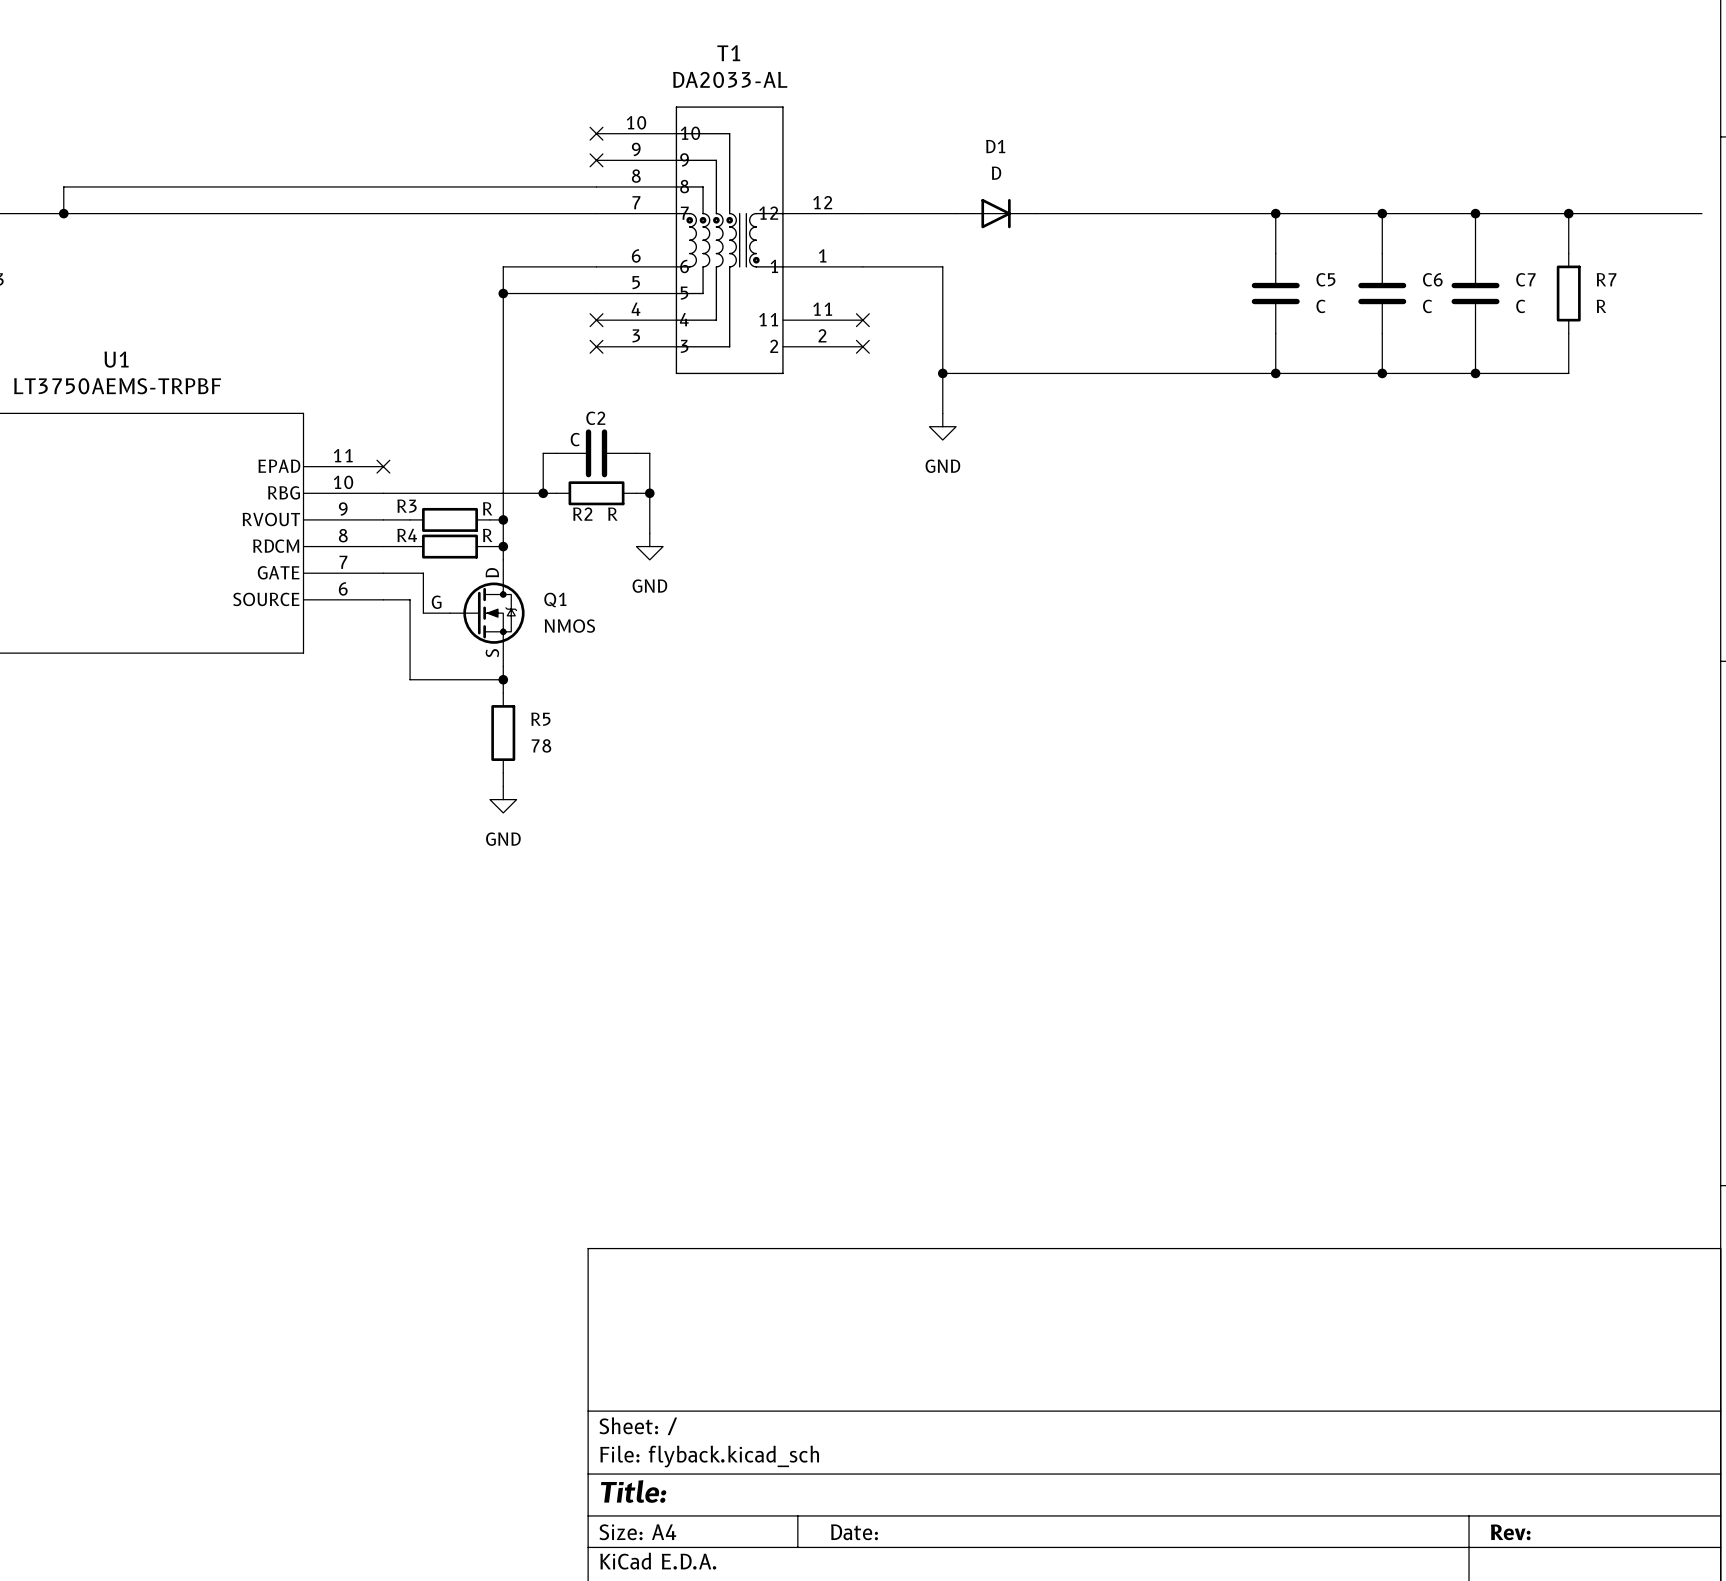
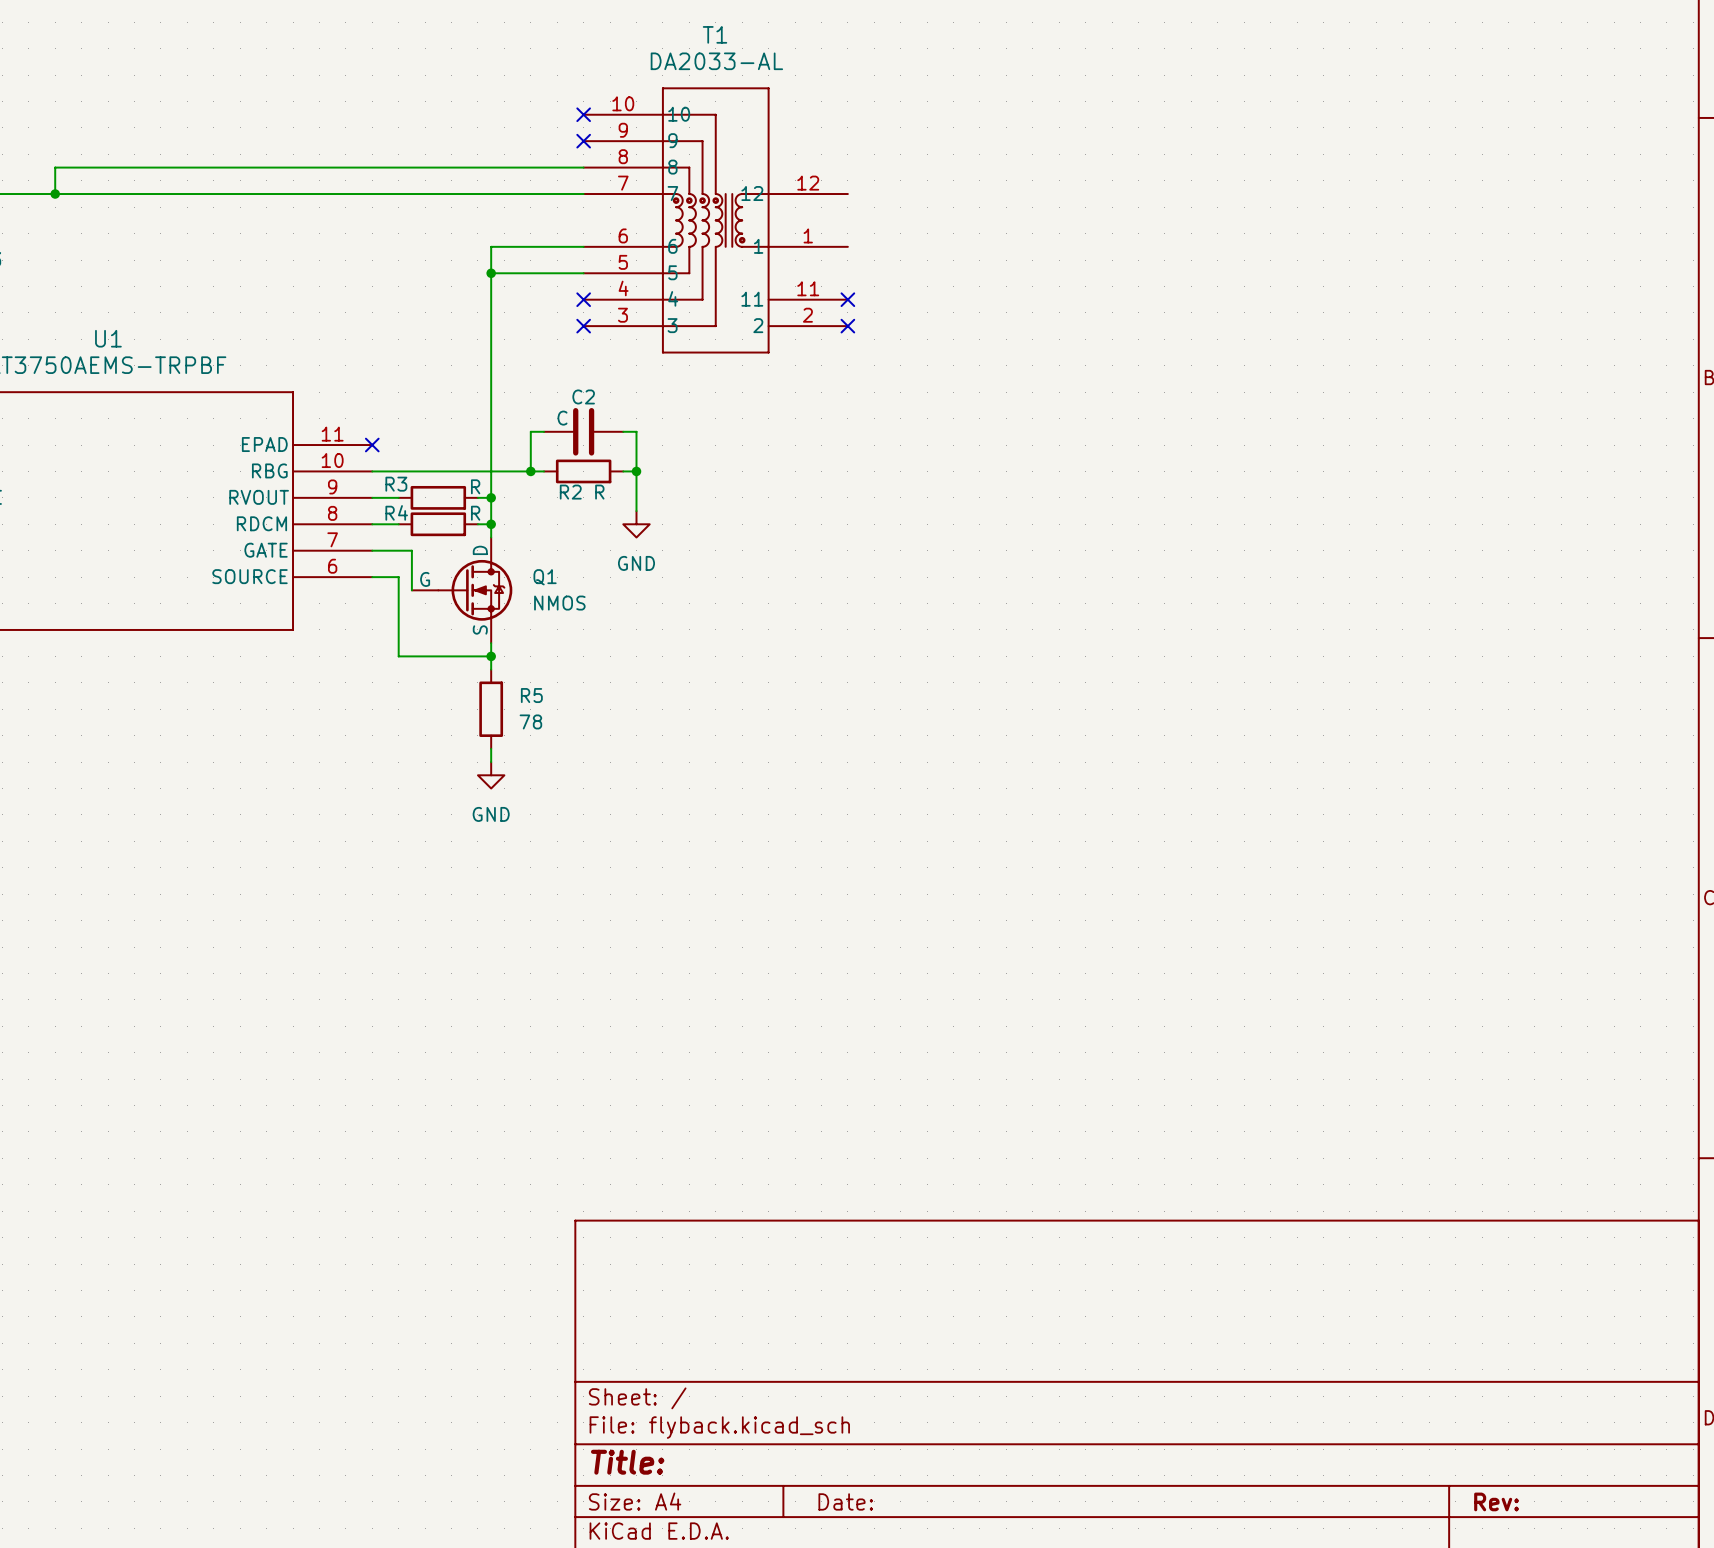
wire: (862, 213) (956, 213) -> none
D1: D (996, 213) -> none
wire: (1036, 213) (1701, 213) -> none
wire: (1275, 213) (1275, 253) -> none
junction: (1275, 213) -> none
wire: (1382, 213) (1382, 253) -> none
junction: (1382, 213) -> none
wire: (1475, 213) (1475, 253) -> none
junction: (1475, 213) -> none
wire: (1568, 213) (1568, 253) -> none
junction: (1568, 213) -> none
wire: (862, 266) (942, 266) (942, 413) -> none
C5: C (1275, 293) -> none
C6: C (1382, 293) -> none
C7: C (1475, 293) -> none
R7: R (1568, 293) -> none
wire: (1275, 333) (1275, 373) -> none
wire: (1382, 333) (1382, 373) -> none
wire: (1475, 333) (1475, 373) -> none
wire: (1568, 333) (1568, 373) (942, 373) -> none
junction: (942, 373) -> none
junction: (1275, 373) -> none
junction: (1382, 373) -> none
junction: (1475, 373) -> none
power symbol: GND (942, 426) -> none

